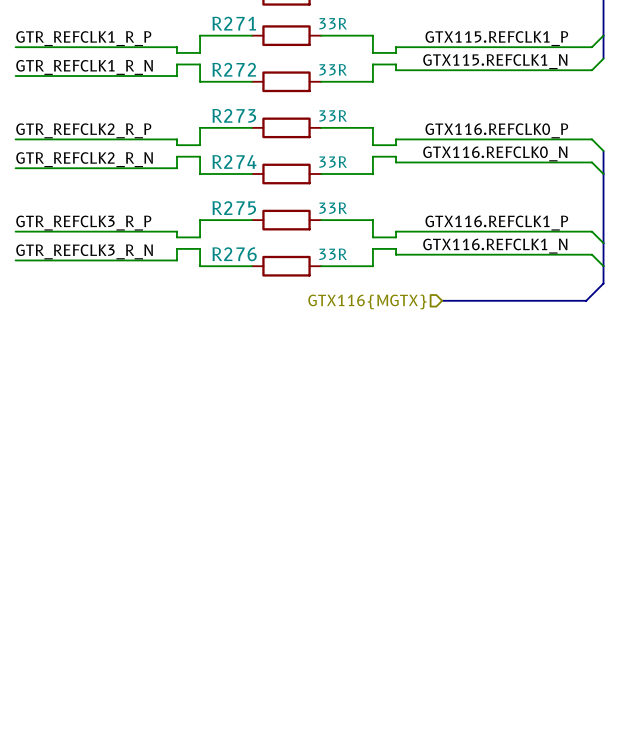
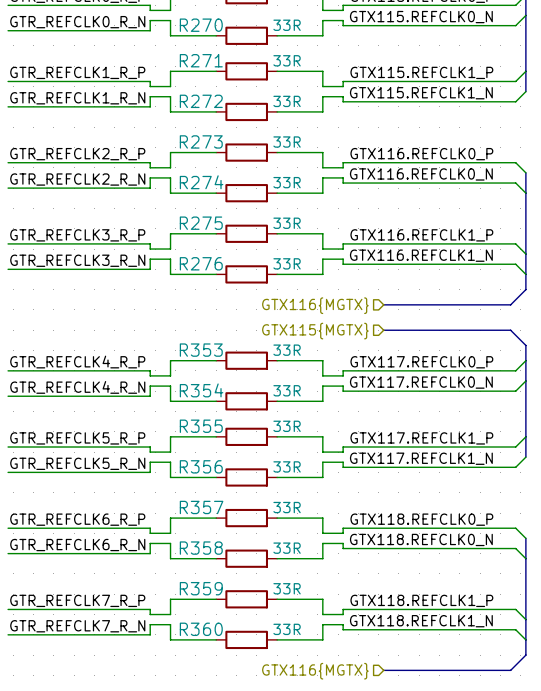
bus: none -> (383, 330) (510, 330) (525, 345) (525, 457)
hierarchical label: none -> GTX115{MGTX} (315, 331)
wire: none -> (216, 360) (170, 360) (170, 375) (150, 375) (150, 370) (8, 370)
R353: none -> (246, 360)
wire: none -> (277, 360) (322, 360) (322, 375) (343, 375) (343, 370) (515, 370) (525, 360)
label: none -> GTR_REFCLK4_R_P (77, 362)
label: none -> GTX117.REFCLK0_P (421, 362)
wire: none -> (525, 381) (515, 391) (343, 391) (343, 386) (322, 386) (322, 401) (277, 401)
label: none -> GTX117.REFCLK0_N (421, 382)
label: none -> GTR_REFCLK4_R_N (77, 387)
wire: none -> (8, 396) (150, 396) (150, 386) (170, 386) (170, 401) (216, 401)
R354: none -> (246, 401)
wire: none -> (216, 436) (170, 436) (170, 452) (150, 452) (150, 447) (8, 447)
R355: none -> (246, 436)
wire: none -> (277, 436) (322, 436) (322, 452) (343, 452) (343, 447) (515, 447) (525, 436)
label: none -> GTR_REFCLK5_R_P (77, 438)
label: none -> GTX117.REFCLK1_P (421, 438)
wire: none -> (525, 457) (515, 467) (343, 467) (343, 462) (322, 462) (322, 477) (277, 477)
label: none -> GTX117.REFCLK1_N (421, 458)
label: none -> GTR_REFCLK5_R_N (77, 463)
wire: none -> (8, 472) (150, 472) (150, 462) (170, 462) (170, 477) (216, 477)
R356: none -> (246, 477)
wire: none -> (216, 518) (170, 518) (170, 533) (150, 533) (150, 528) (8, 528)
R357: none -> (246, 518)
wire: none -> (277, 518) (322, 518) (322, 533) (343, 533) (343, 528) (515, 528) (525, 538)
label: none -> GTR_REFCLK6_R_P (77, 519)
label: none -> GTX118.REFCLK0_P (421, 519)
bus: none -> (525, 538) (525, 655) (510, 670) (383, 670)
label: none -> GTX118.REFCLK0_N (421, 539)
label: none -> GTR_REFCLK6_R_N (77, 545)
wire: none -> (8, 553) (150, 553) (150, 543) (170, 543) (170, 558) (216, 558)
R358: none -> (246, 558)
wire: none -> (277, 558) (322, 558) (322, 543) (343, 543) (343, 548) (515, 548) (525, 558)
wire: none -> (216, 599) (170, 599) (170, 614) (150, 614) (150, 609) (8, 609)
R359: none -> (246, 599)
wire: none -> (277, 599) (322, 599) (322, 614) (343, 614) (343, 609) (515, 609) (525, 619)
label: none -> GTR_REFCLK7_R_P (77, 600)
label: none -> GTX118.REFCLK1_P (421, 600)
label: none -> GTX118.REFCLK1_N (421, 621)
label: none -> GTR_REFCLK7_R_N (77, 626)
wire: none -> (8, 634) (150, 634) (150, 624) (170, 624) (170, 639) (216, 639)
R360: none -> (246, 639)
wire: none -> (277, 639) (322, 639) (322, 624) (343, 624) (343, 629) (515, 629) (525, 639)
hierarchical label: none -> GTX116{MGTX} (315, 671)

